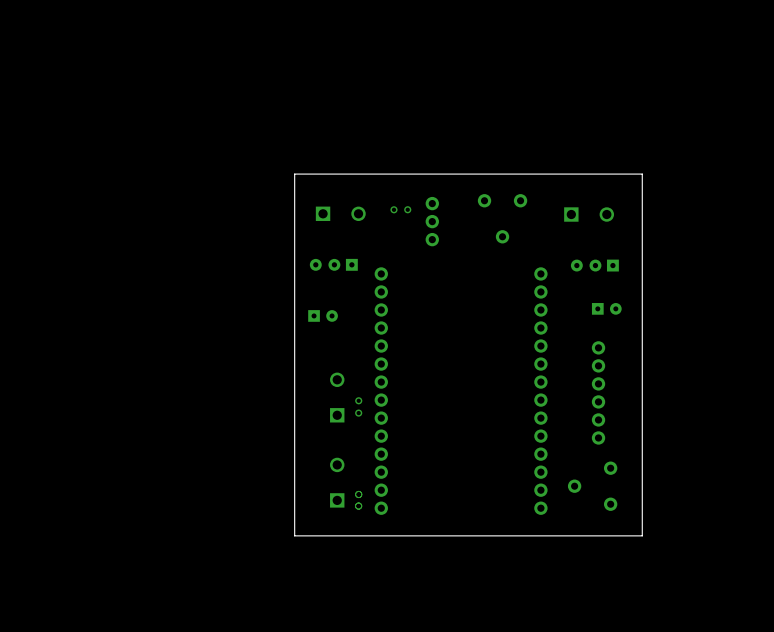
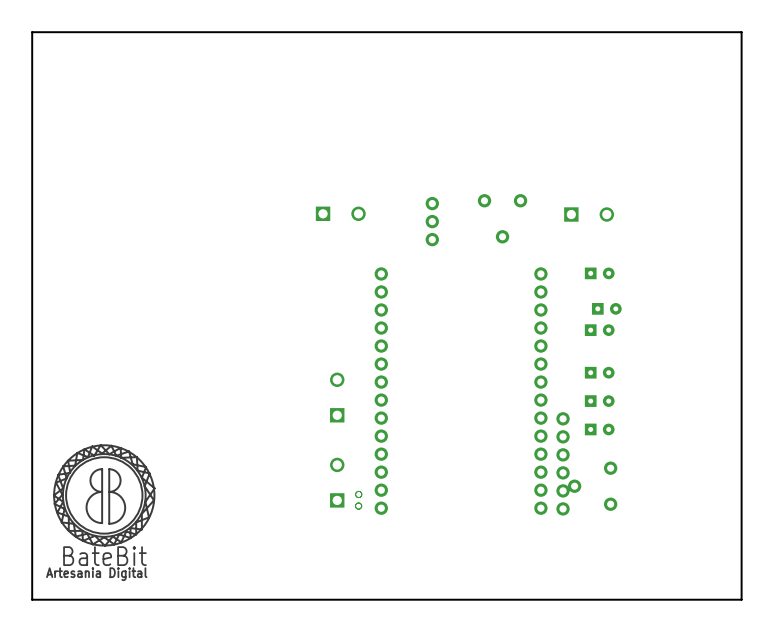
board edge: none -> (32, 32) (741, 32) (741, 599) (32, 599) (32, 32)
board edge: (294, 174) (642, 174) (642, 535) (294, 535) (294, 174) -> none
via: (393, 209) -> none
via: (407, 209) -> none
part: (333, 264) -> none
part: (594, 265) -> none
part: none -> (599, 273)
part: (323, 315) -> none
part: none -> (599, 330)
part: none -> (599, 372)
part position: (598, 392) -> (563, 463)
via: (358, 400) -> none
part: none -> (599, 401)
via: (358, 413) -> none
part: none -> (599, 429)
drawing: none -> [53, 444, 156, 547]

